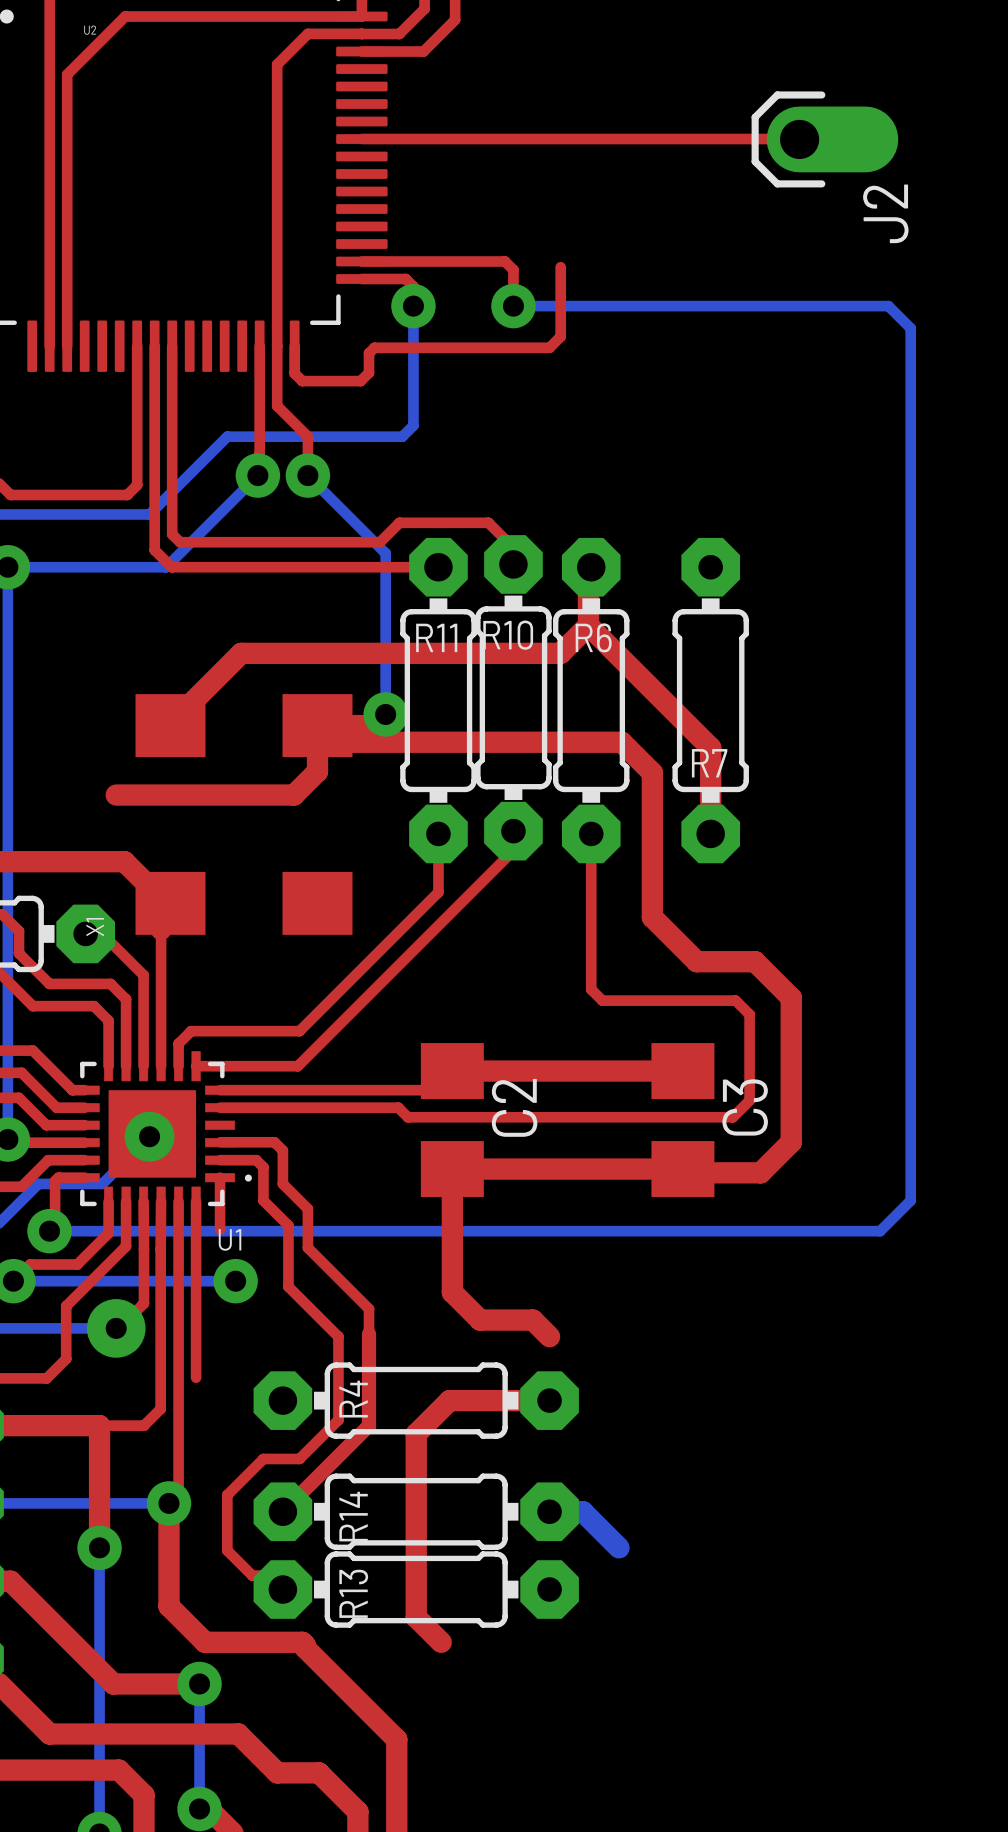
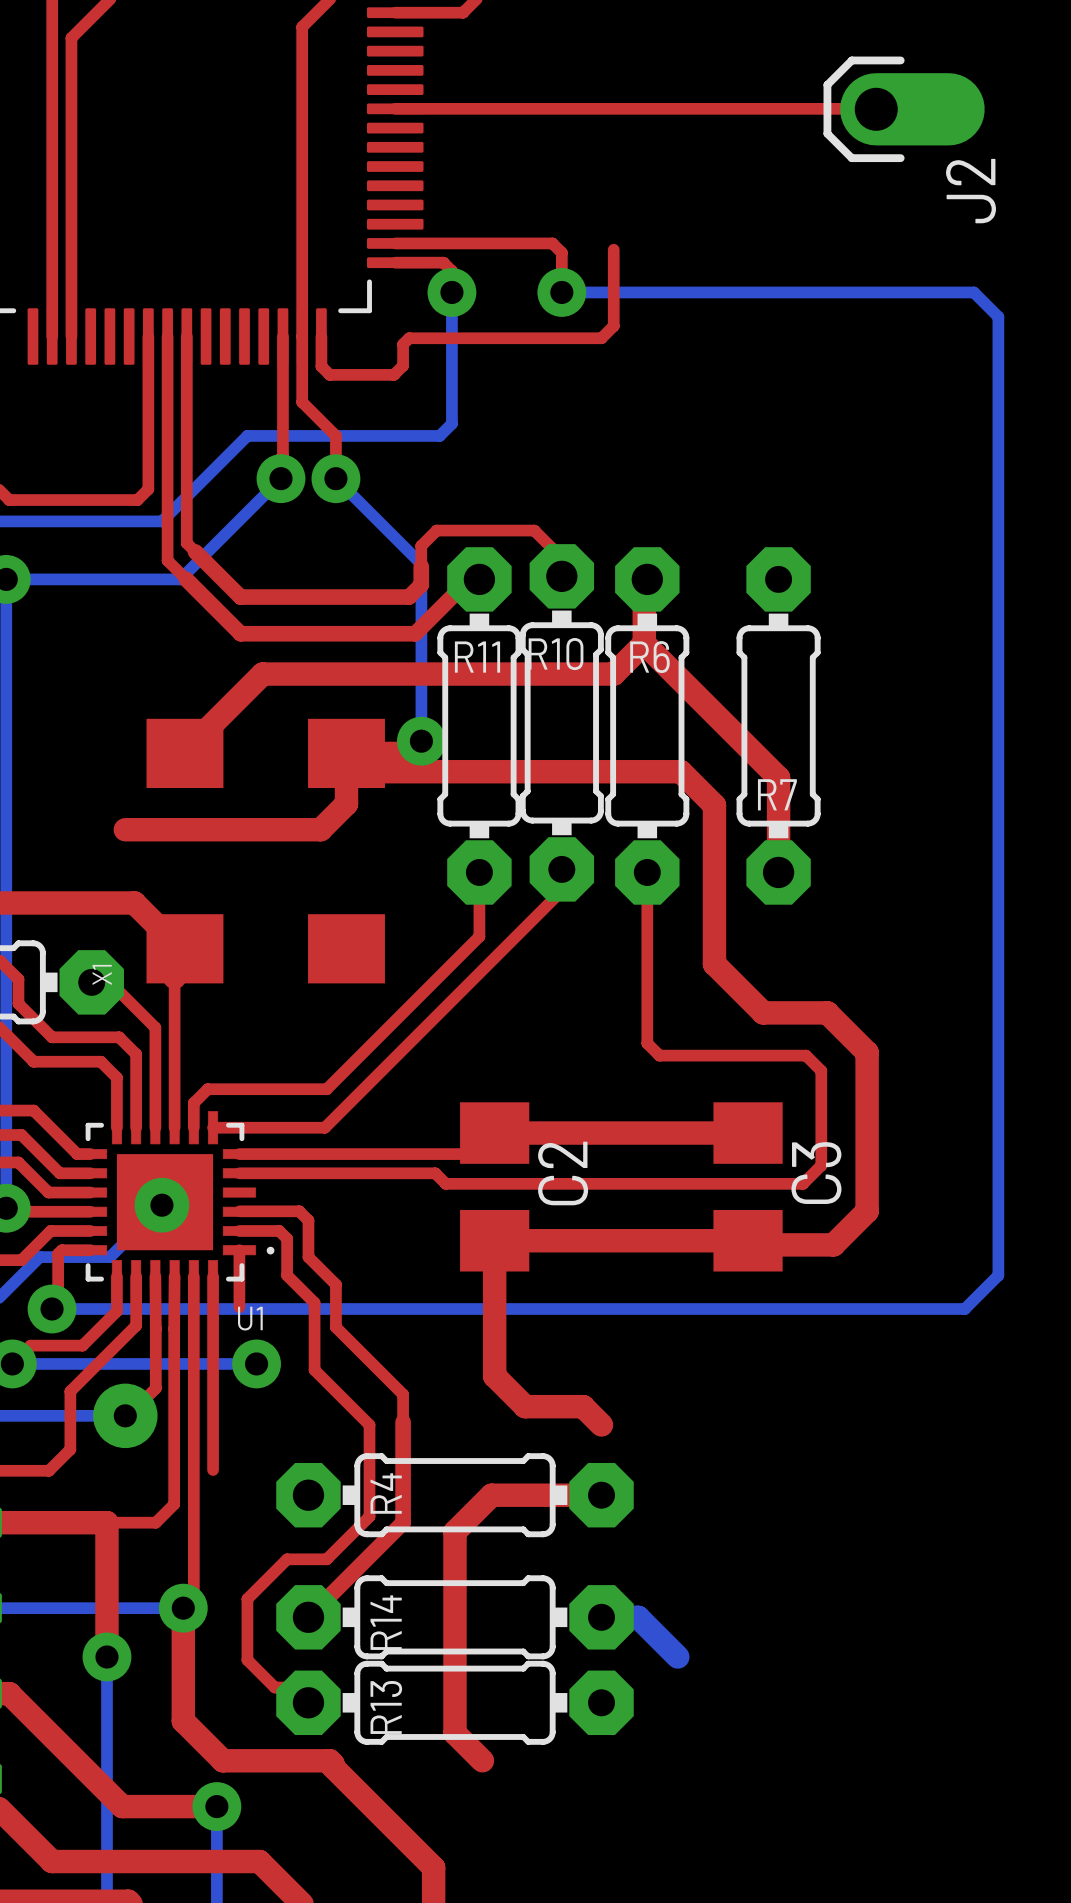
top track: (385, 536) (380, 542) (180, 542) -> (421, 545) (421, 584) (409, 597) (240, 597) (195, 551)
top track: (171, 567) (429, 567) -> (186, 579) (240, 633) (415, 633) (469, 579)

